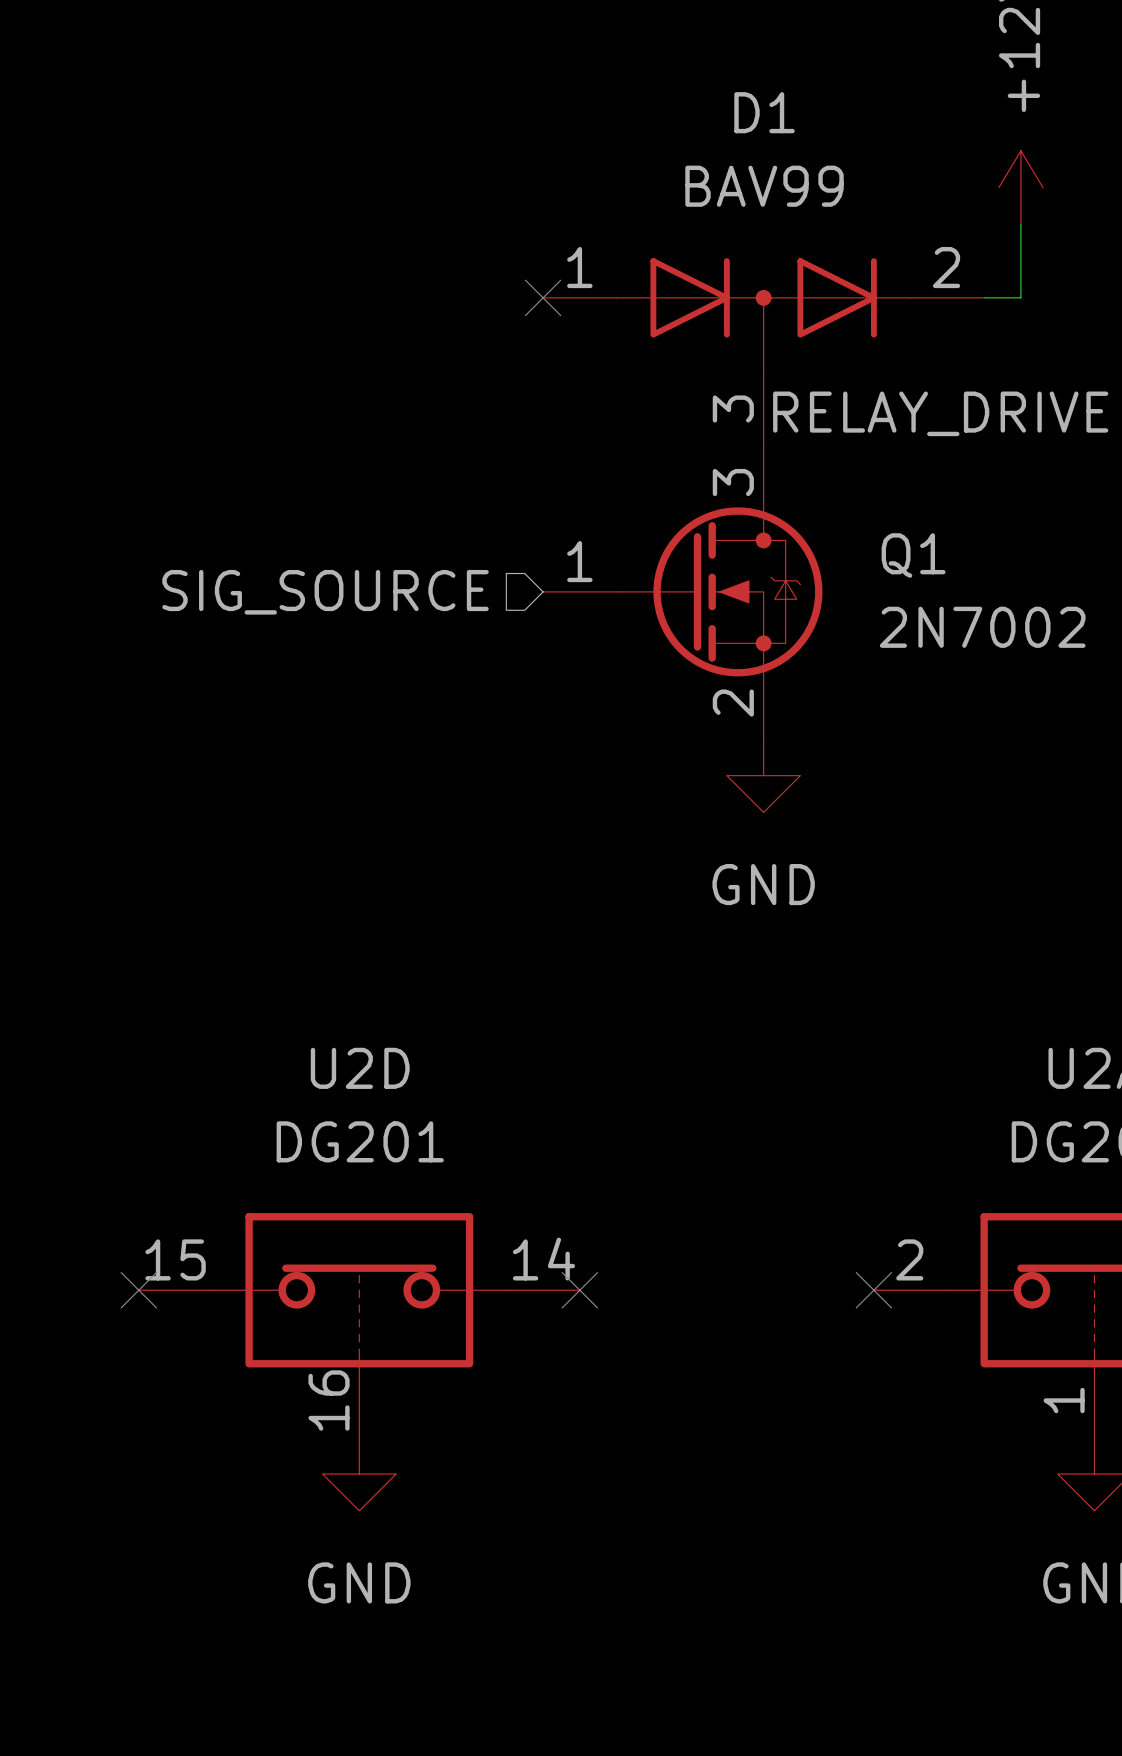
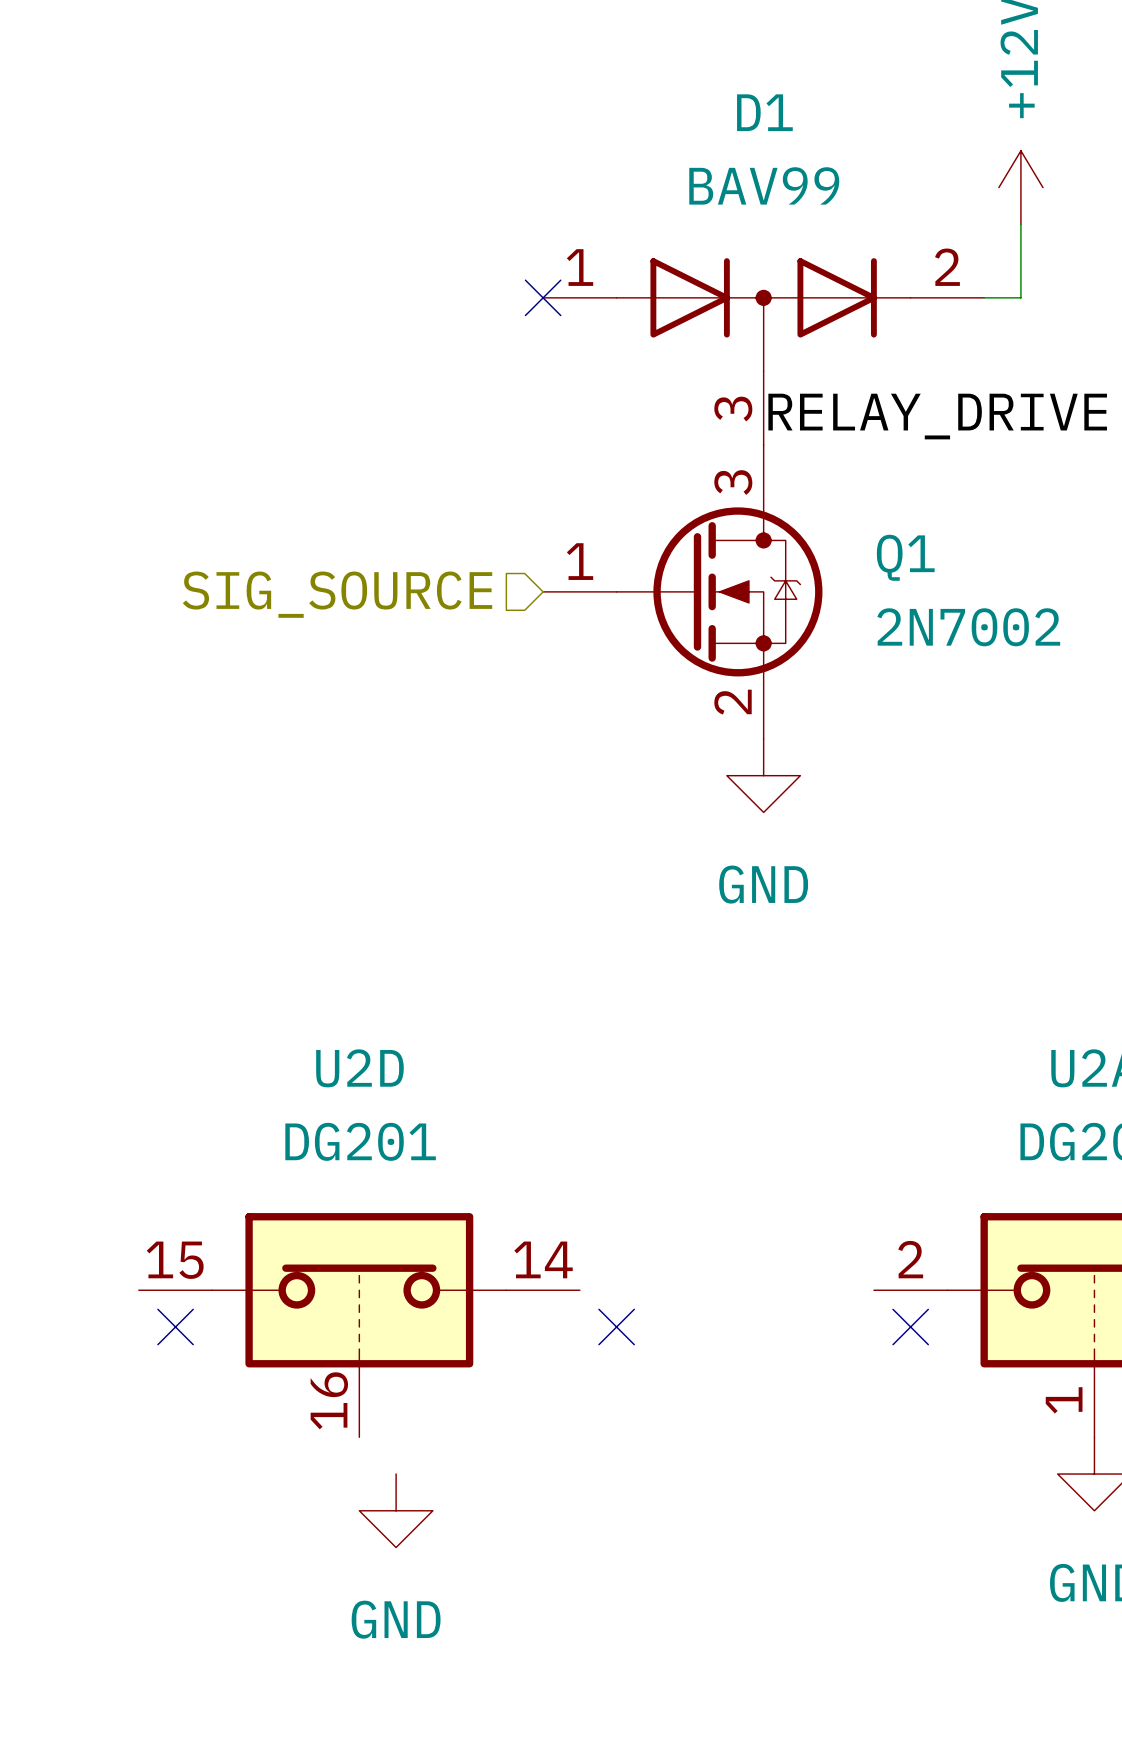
no-connect mark position: (138, 1290) -> (175, 1327)
no-connect mark position: (579, 1290) -> (616, 1327)
no-connect mark position: (873, 1290) -> (910, 1327)
power symbol position: GND (359, 1474) -> GND (396, 1510)

